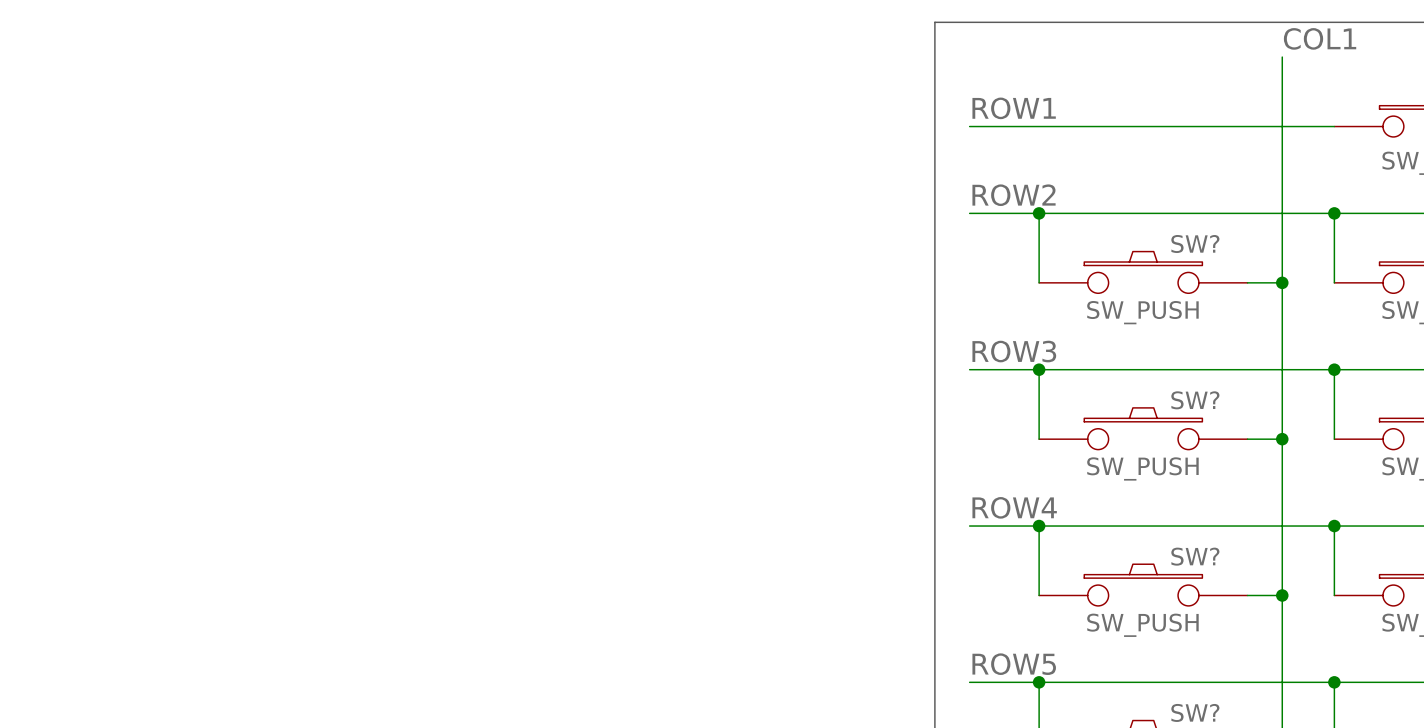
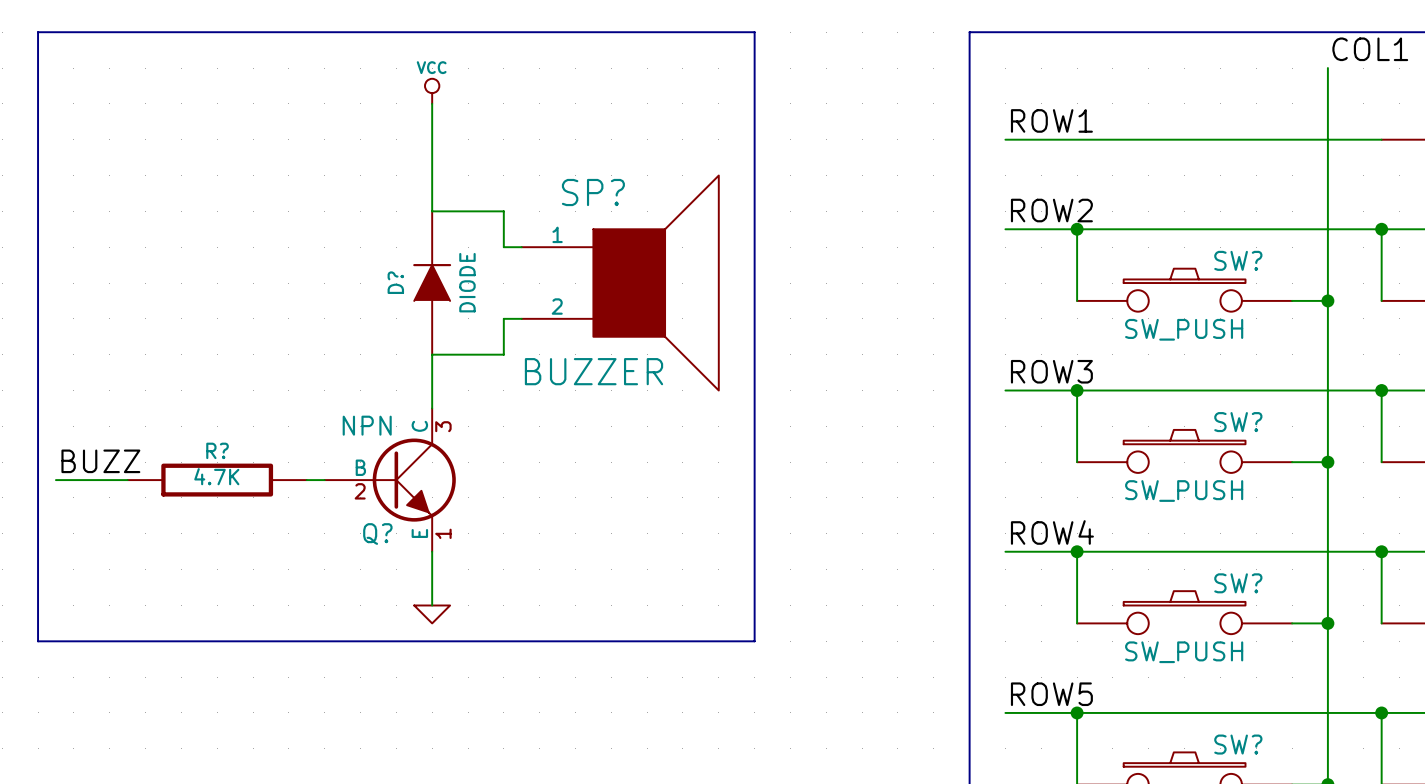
bus: none -> (38, 32) (754, 32) (754, 641) (38, 641) (38, 32)
power symbol: none -> VCC (432, 91)
wire: none -> (432, 103) (432, 211) (503, 211) (503, 247) (521, 247)
D?: none -> DIODE (432, 283)
SP?: none -> BUZZER (620, 283)
wire: none -> (521, 318) (503, 318) (503, 354) (432, 354) (432, 408)
label: none -> BUZZ (100, 461)
wire: none -> (55, 480) (127, 480)
R?: none -> 4.7K (217, 480)
wire: none -> (306, 480) (324, 480)
Q?: none -> NPN (390, 480)
wire: none -> (432, 551) (432, 605)
power symbol: none -> (432, 614)

